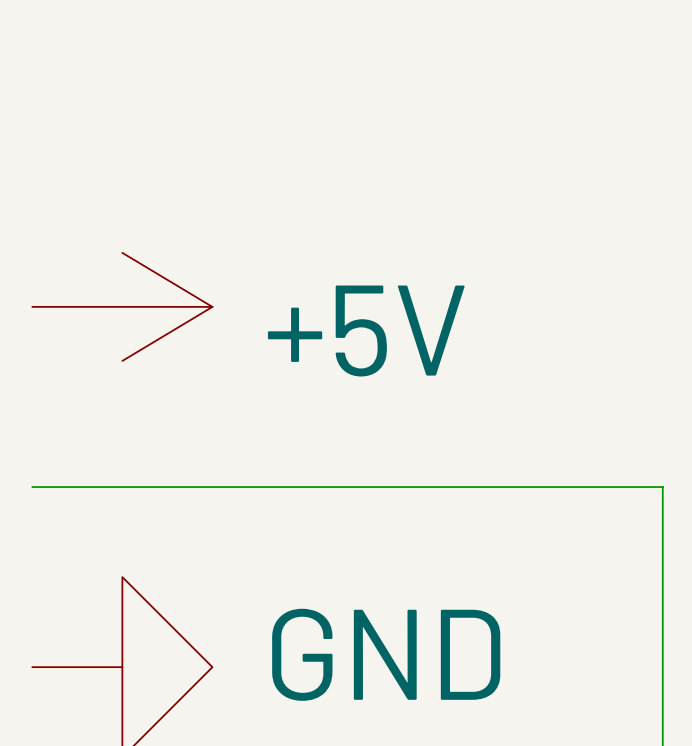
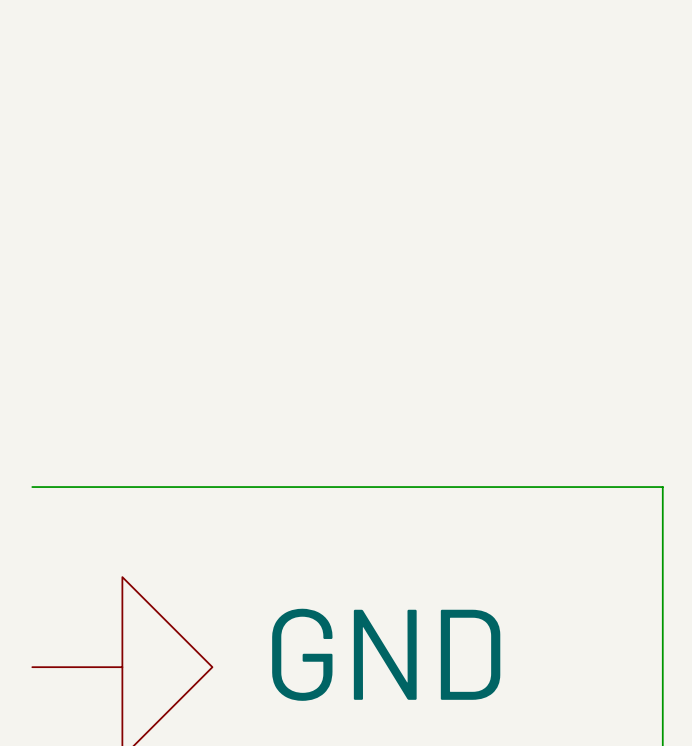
power symbol: +5V (122, 306) -> none

